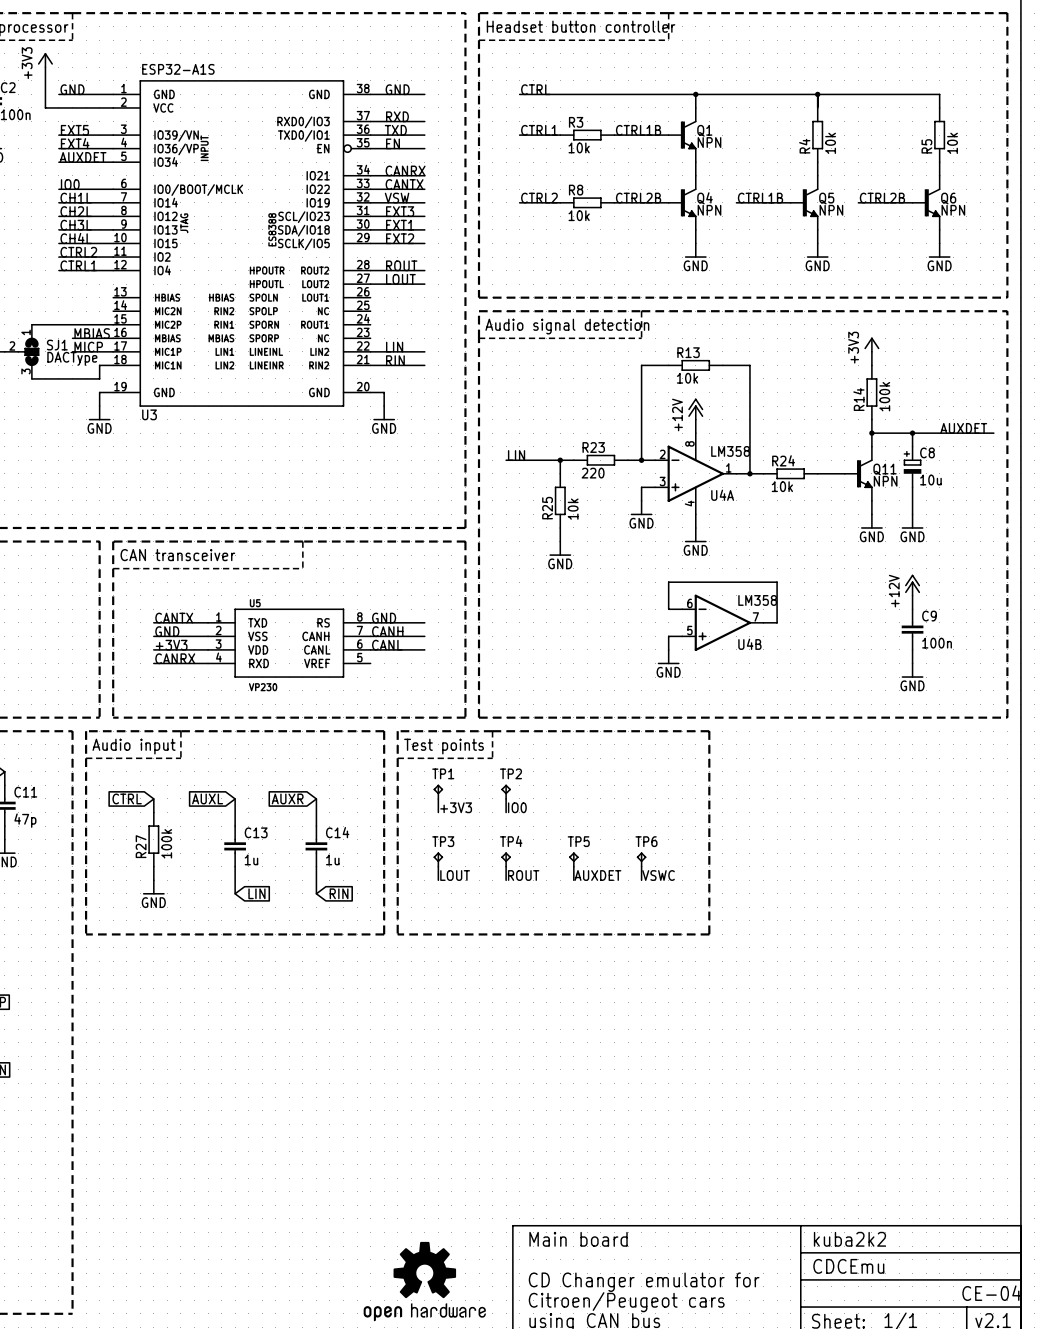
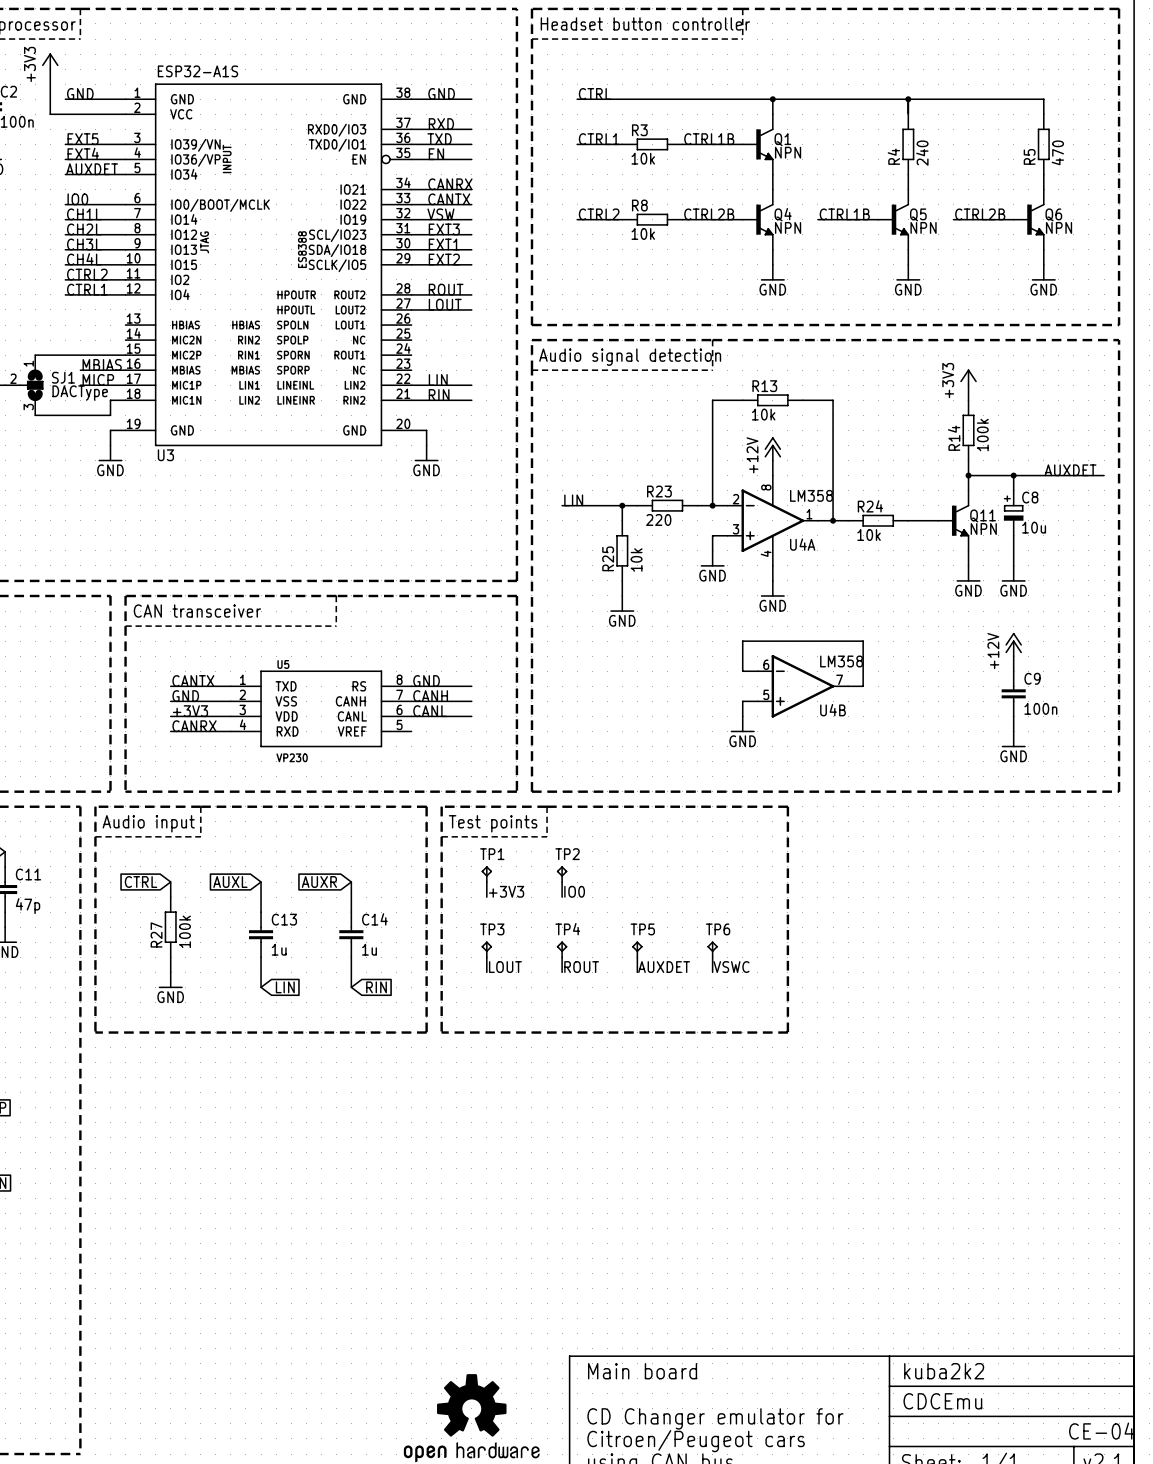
R4 value: 10k (830, 143) -> 240 (922, 153)
R5 value: 10k (952, 143) -> 470 (1057, 152)

